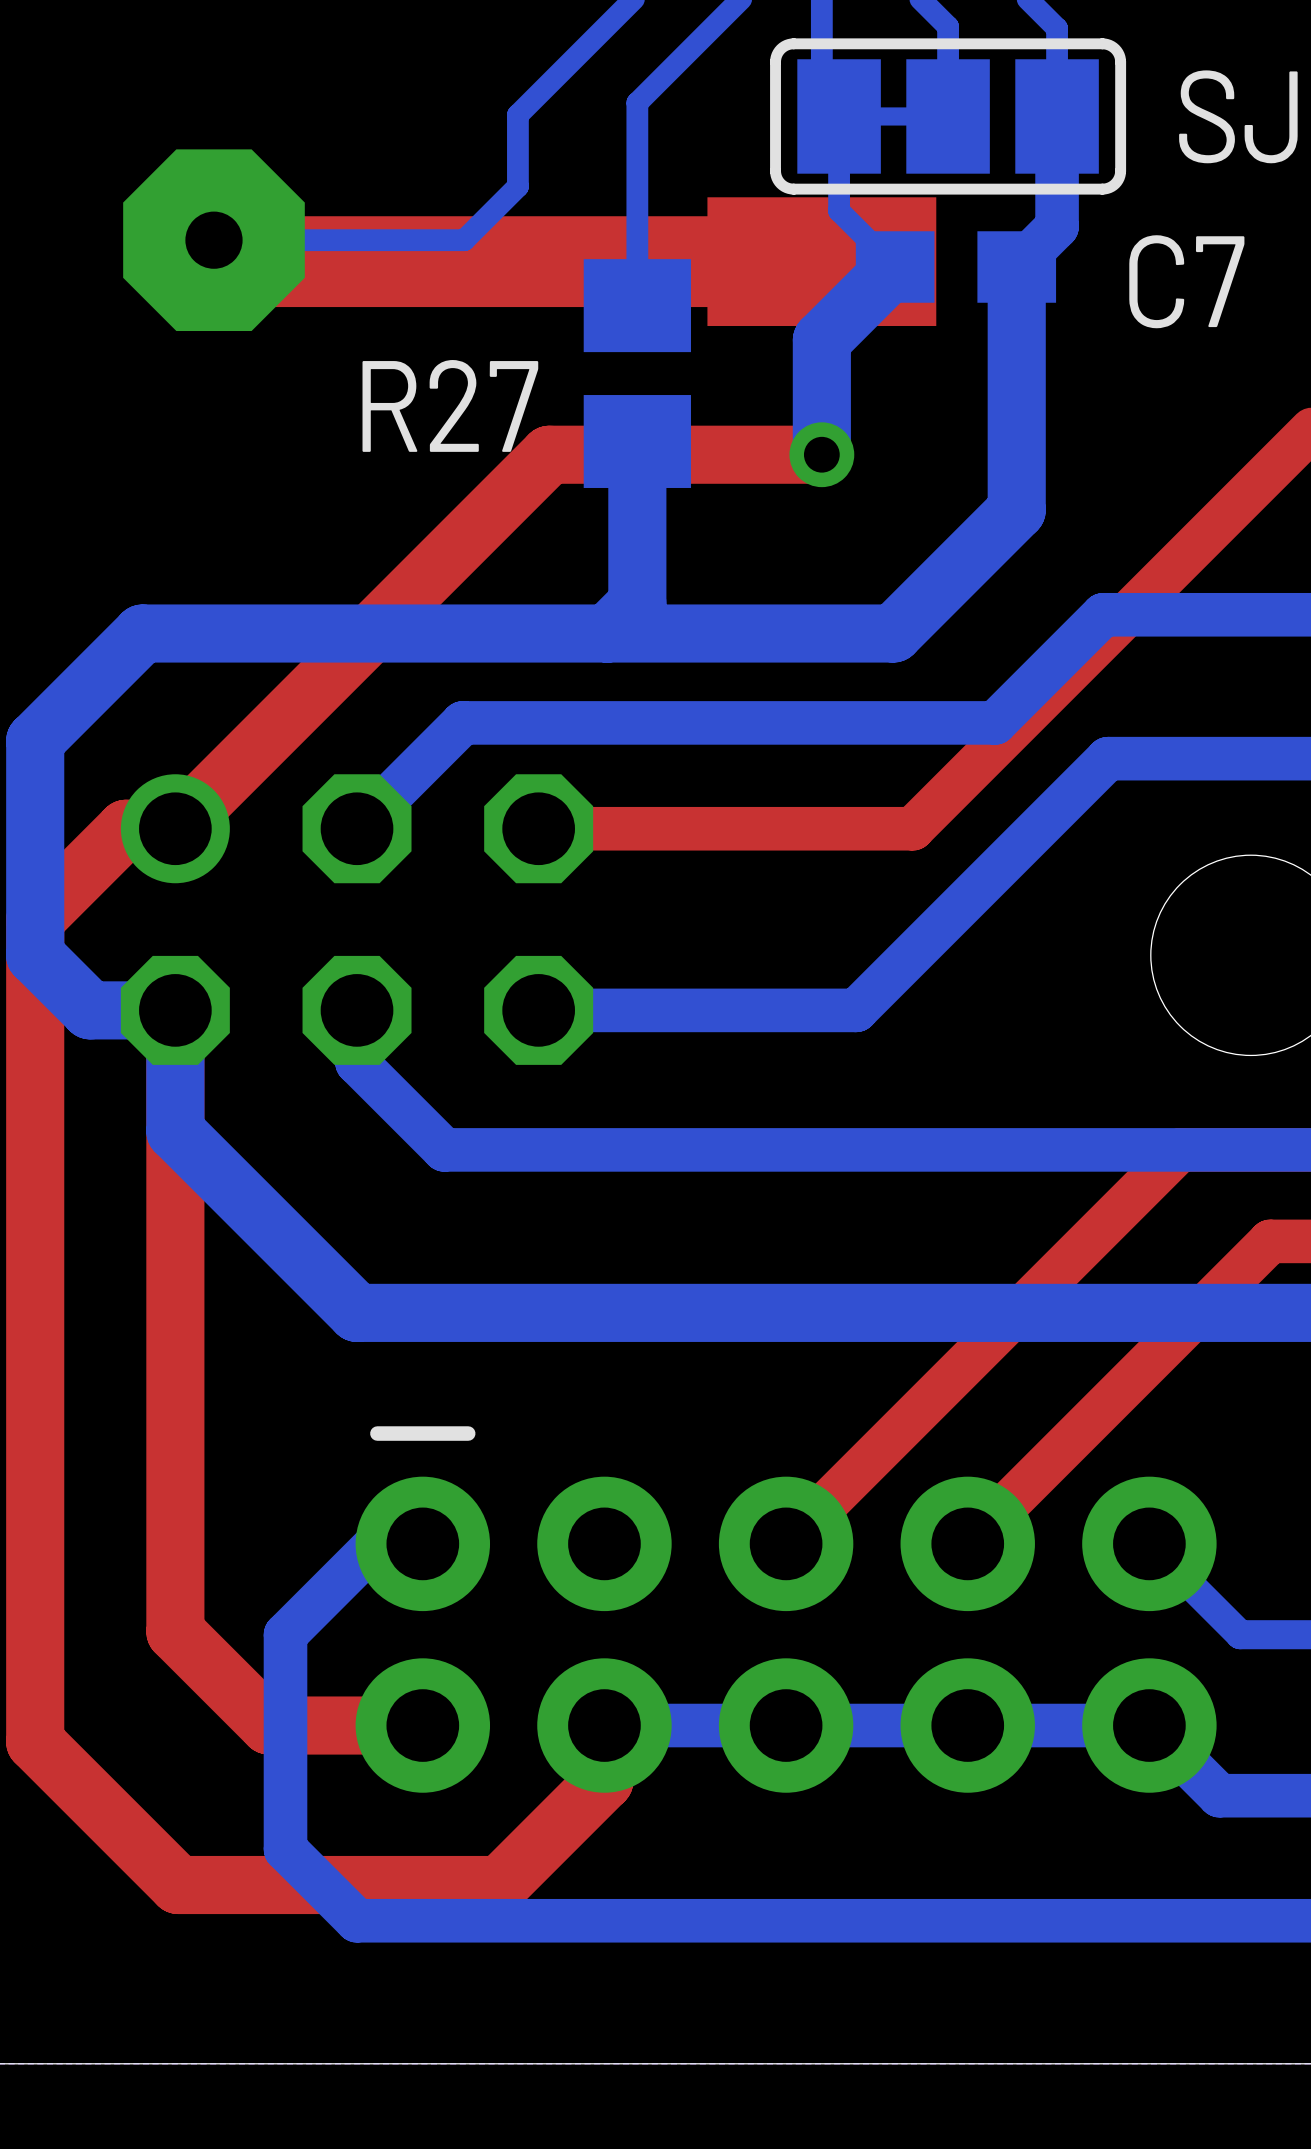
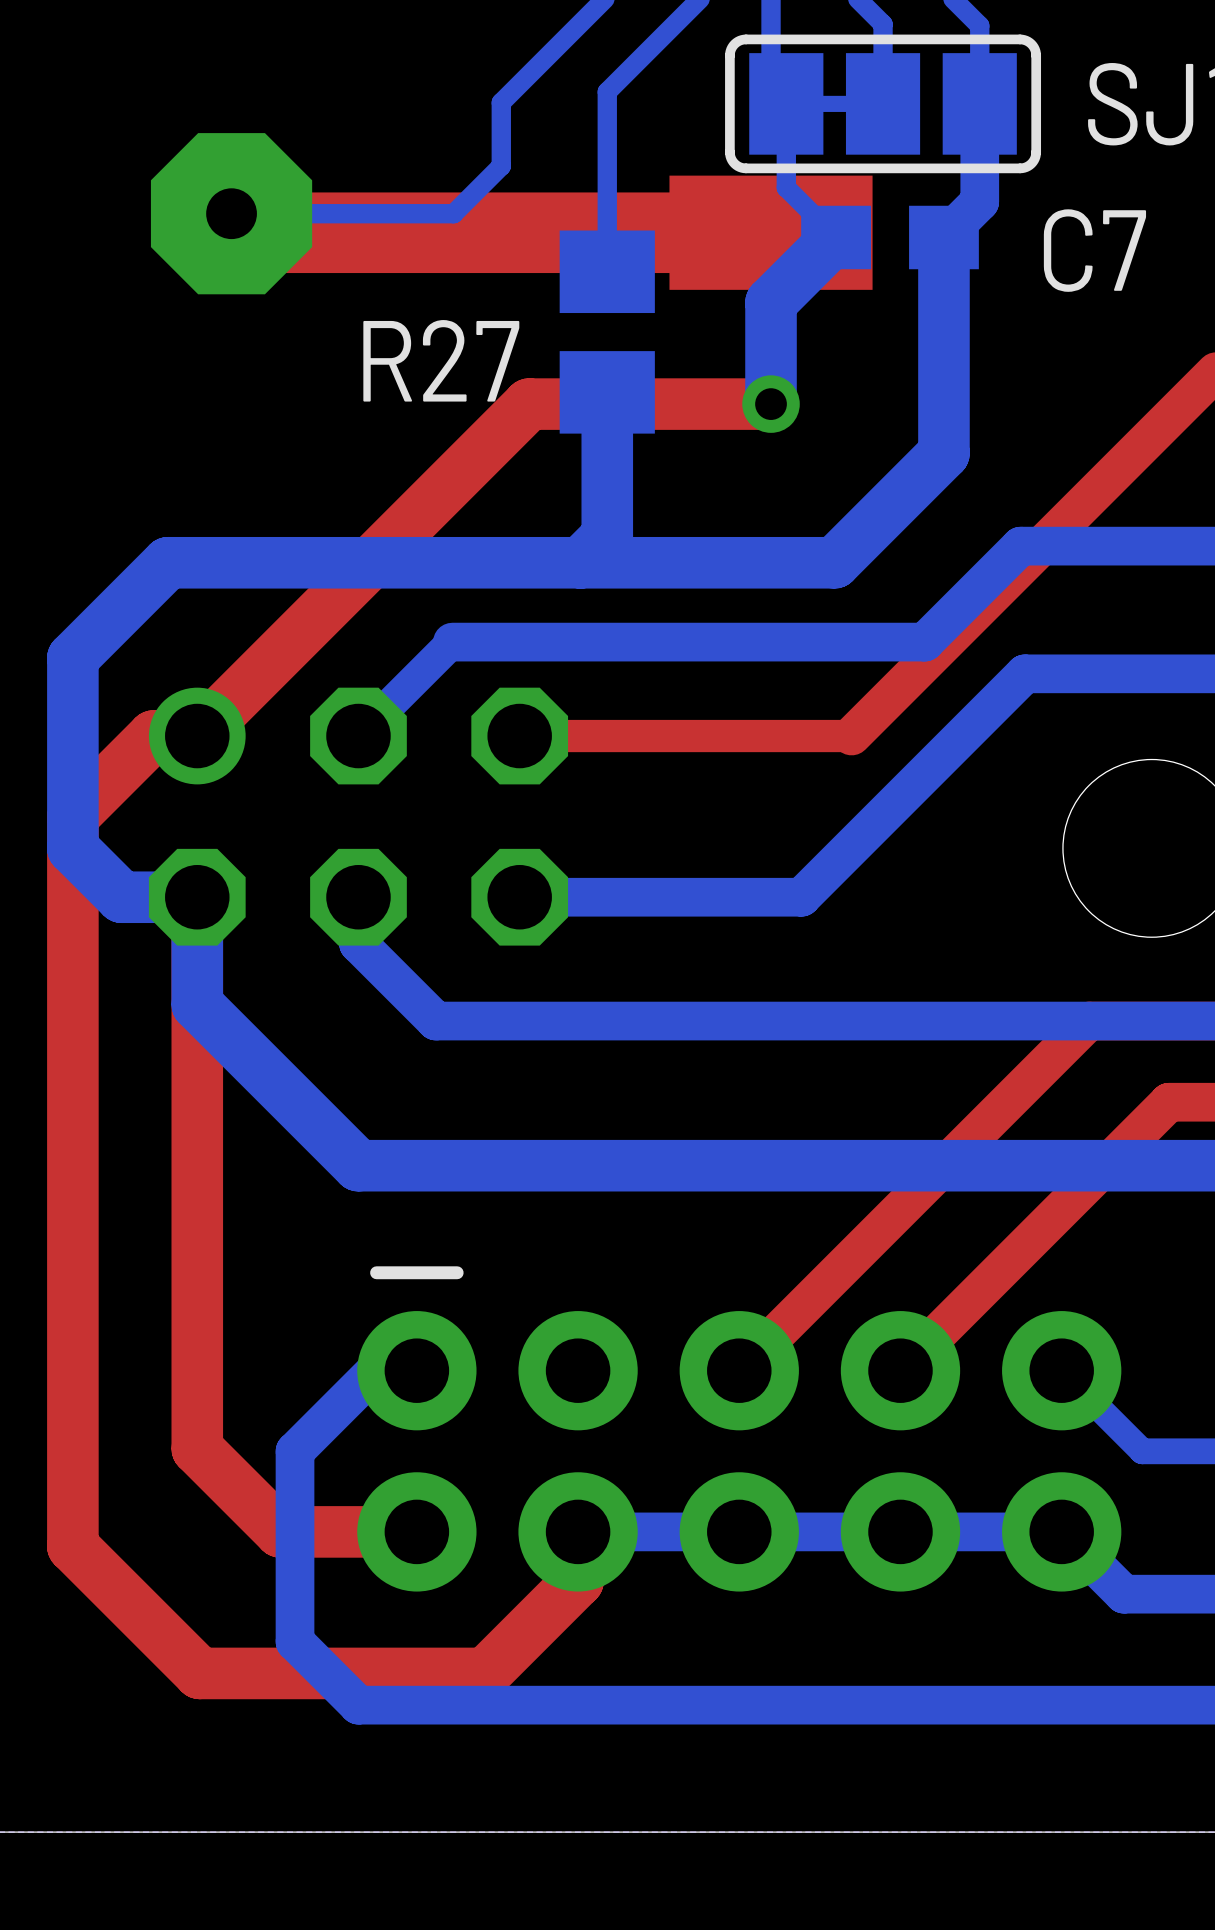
bottom track width: thick (462, 722) (357, 828) -> thin (452, 642) (358, 736)
top track width: thick (912, 828) (538, 828) -> thin (851, 736) (519, 736)

